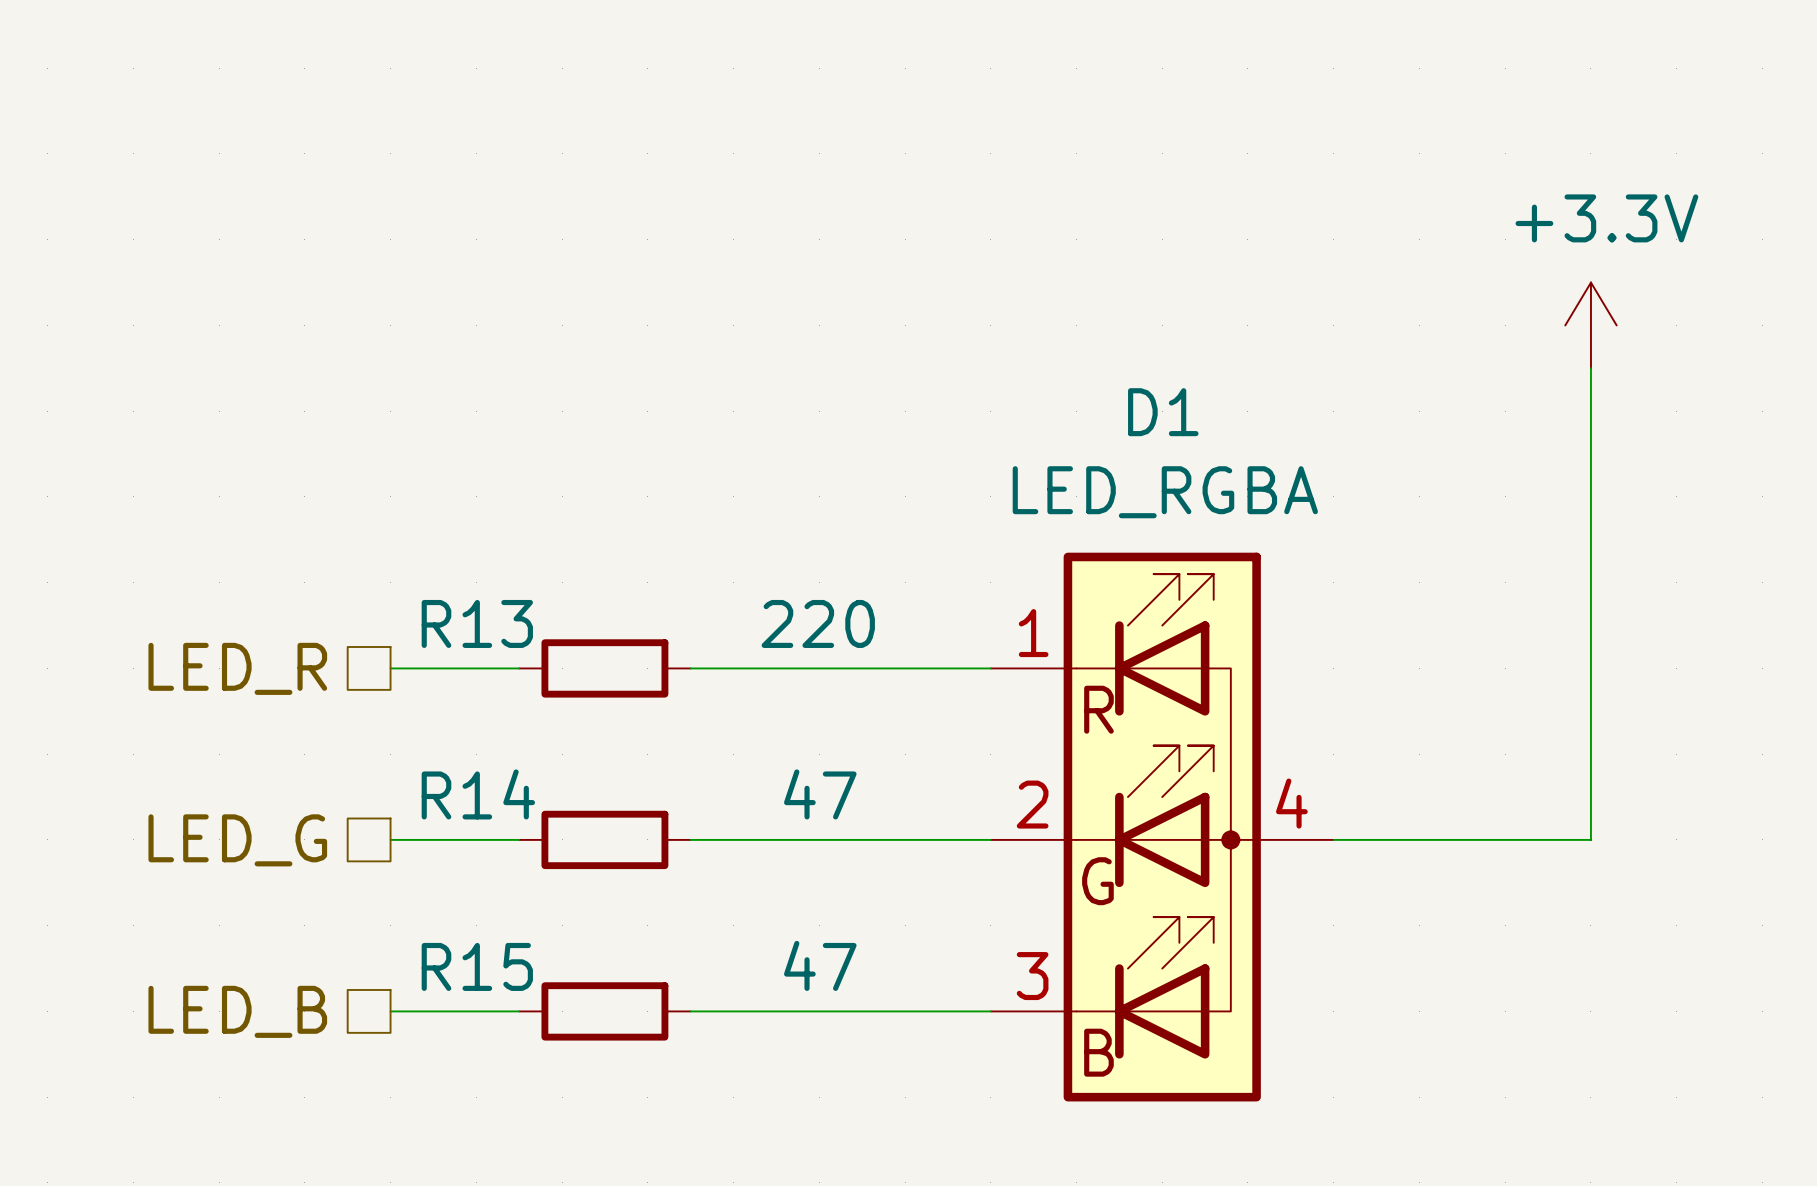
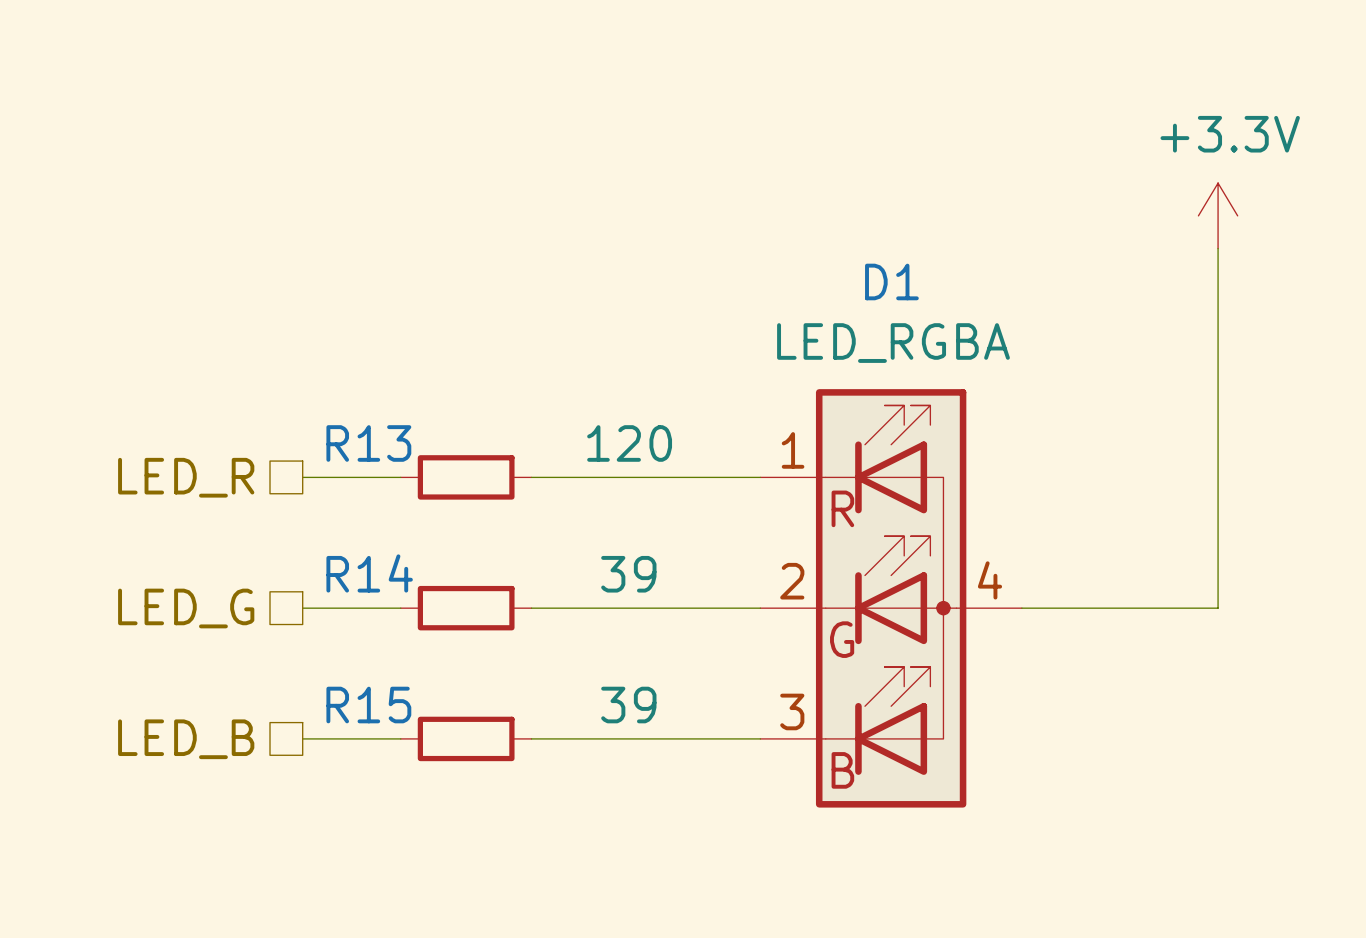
R13 value: 220 (818, 623) -> 120 (629, 443)
R14 value: 47 (820, 794) -> 39 (628, 574)
R15 value: 47 (820, 965) -> 39 (628, 705)

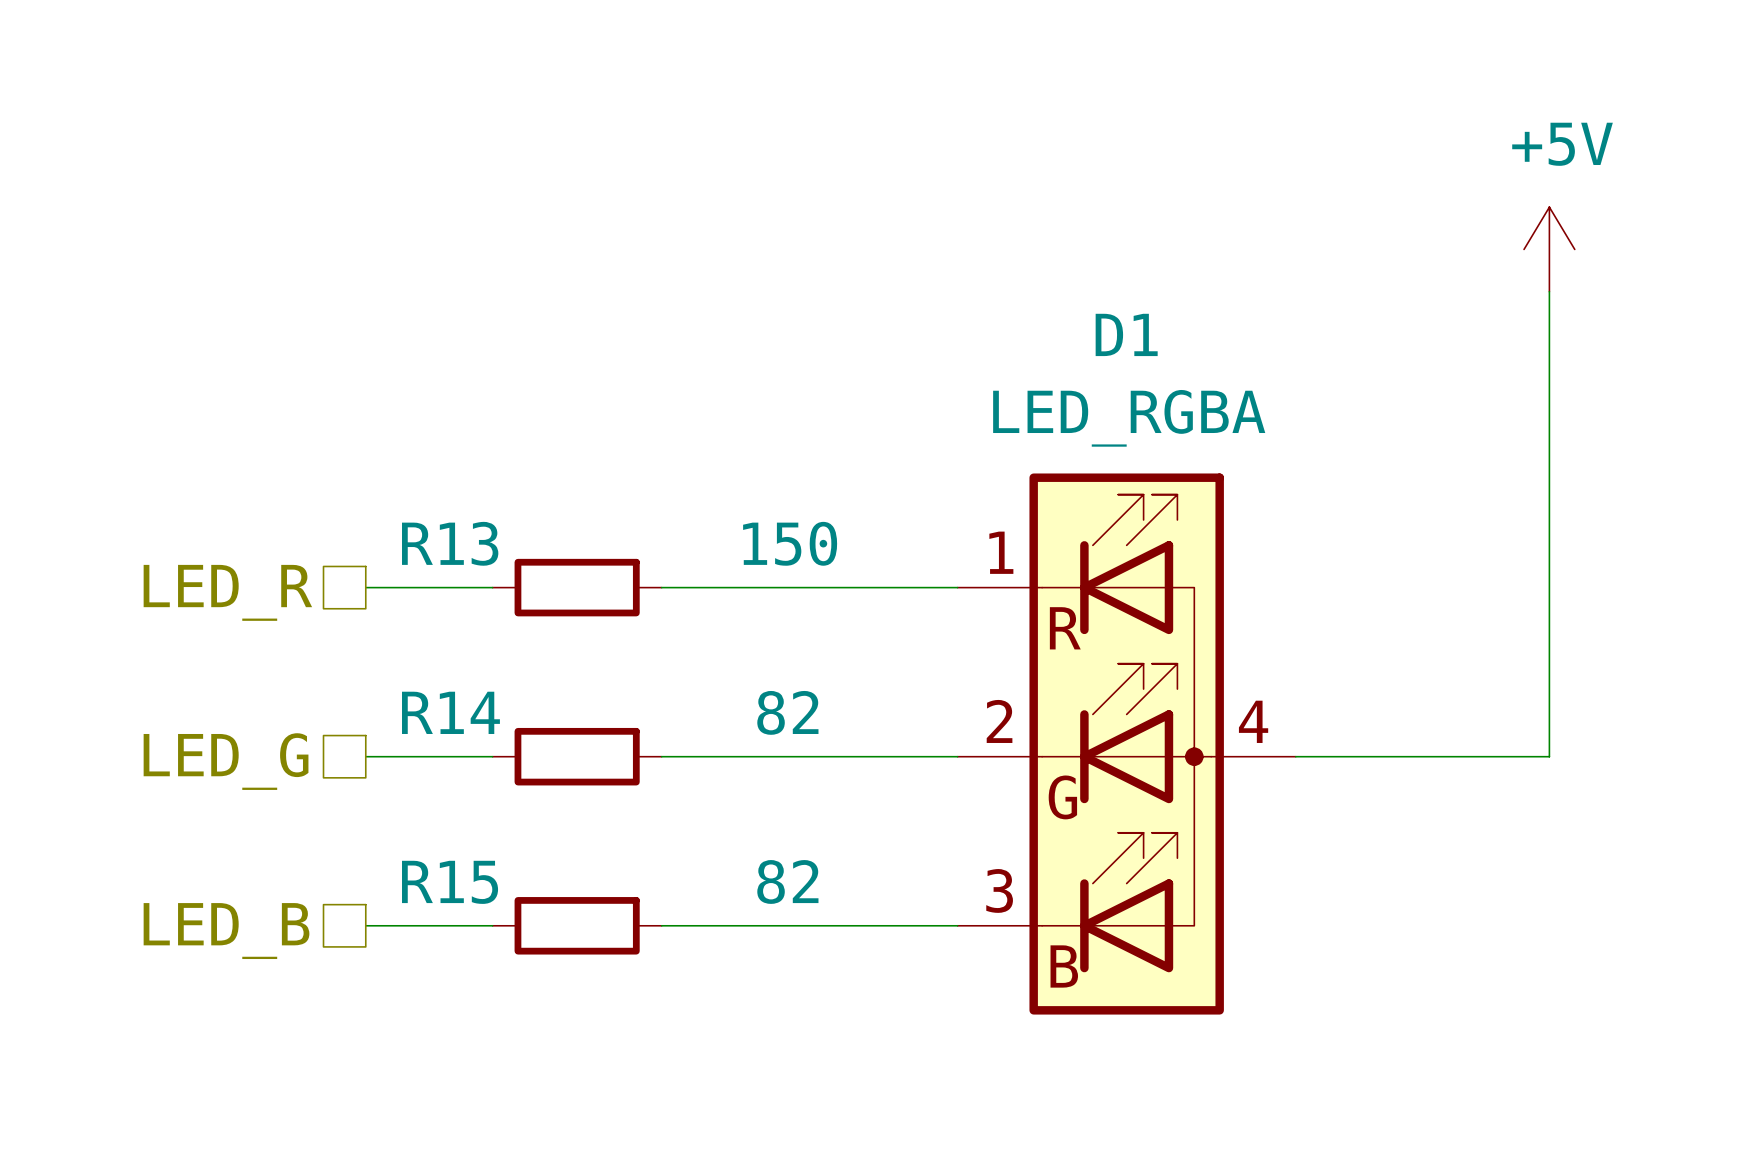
power symbol: +3.3V (1218, 215) -> +5V (1549, 249)
R13 value: 120 (629, 443) -> 150 (790, 543)
R14 value: 39 (628, 574) -> 82 (787, 712)
R15 value: 39 (628, 705) -> 82 (787, 881)

